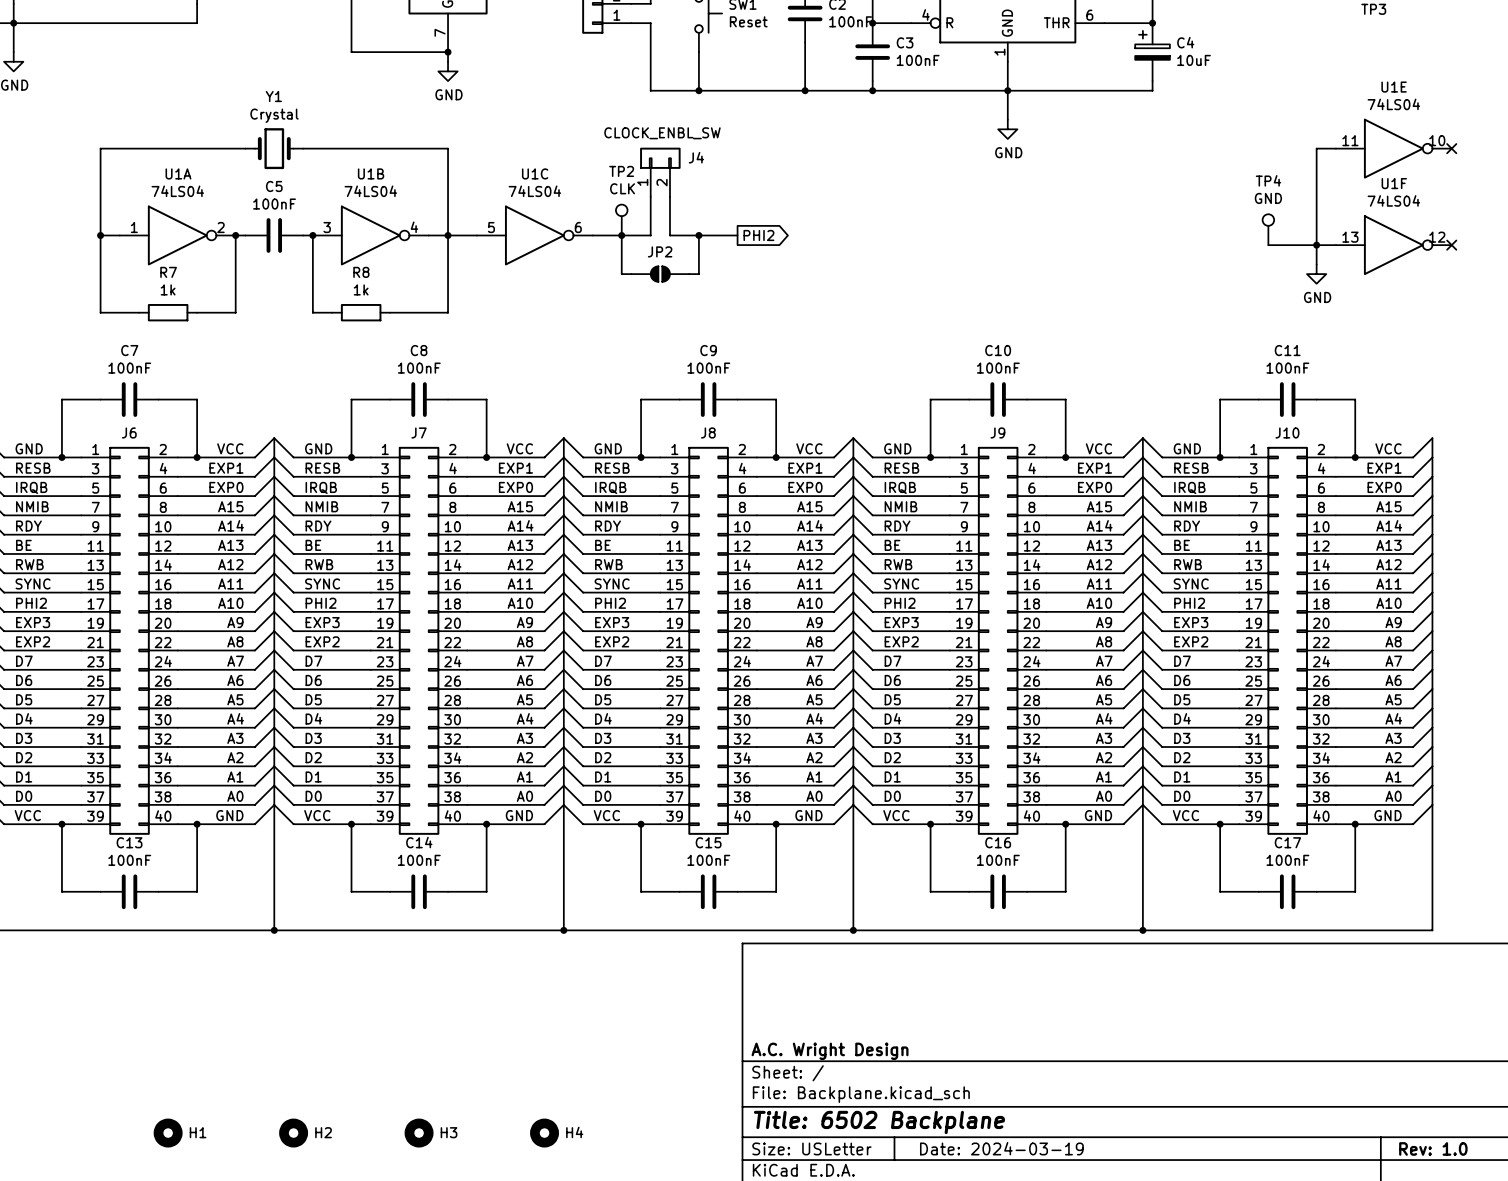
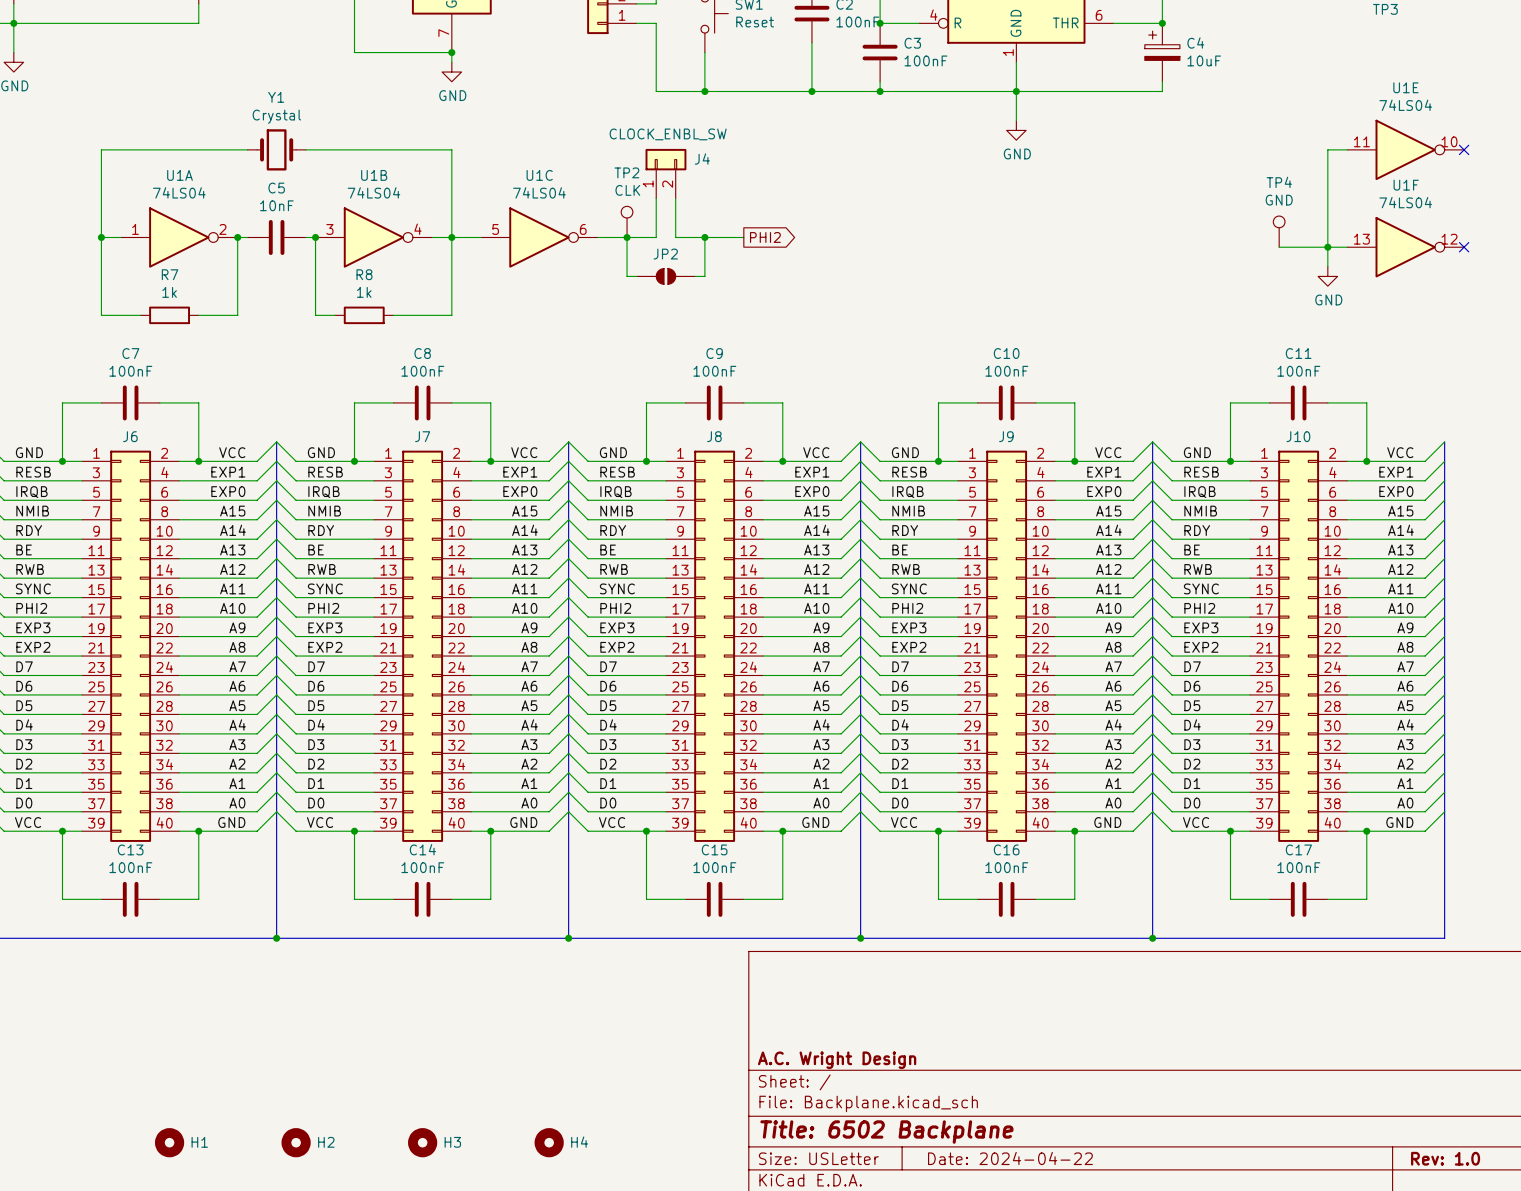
C5 value: 100nF (274, 204) -> 10nF (276, 205)
title block: Date: 2024-03-19 (1001, 1148) -> Date: 2024-04-22 (1010, 1158)

